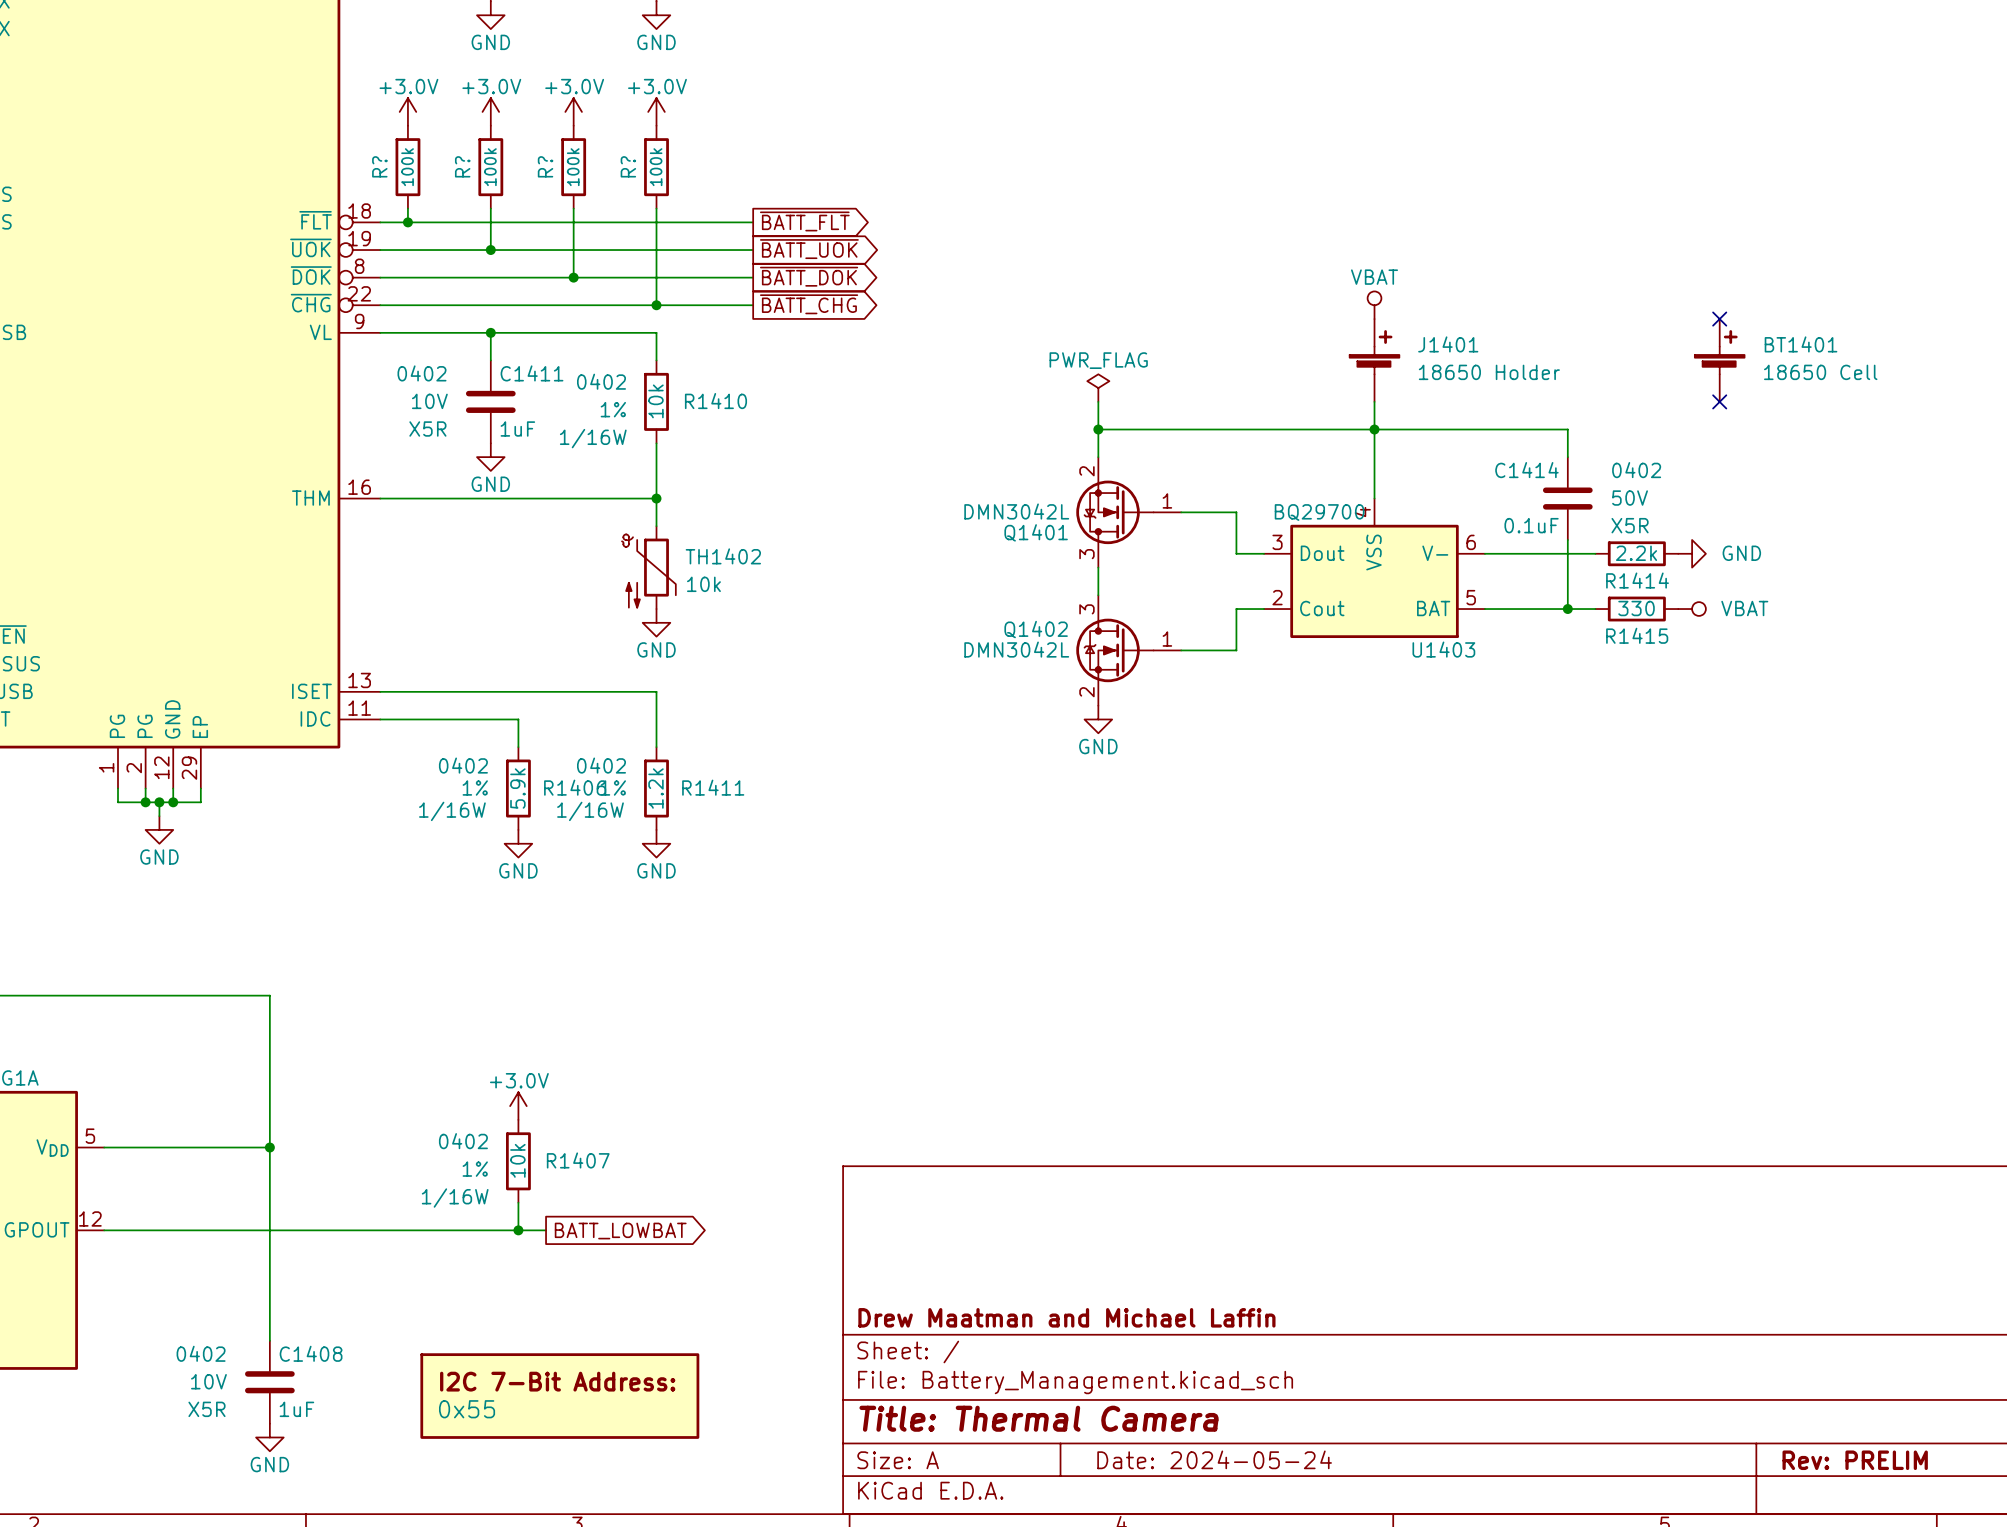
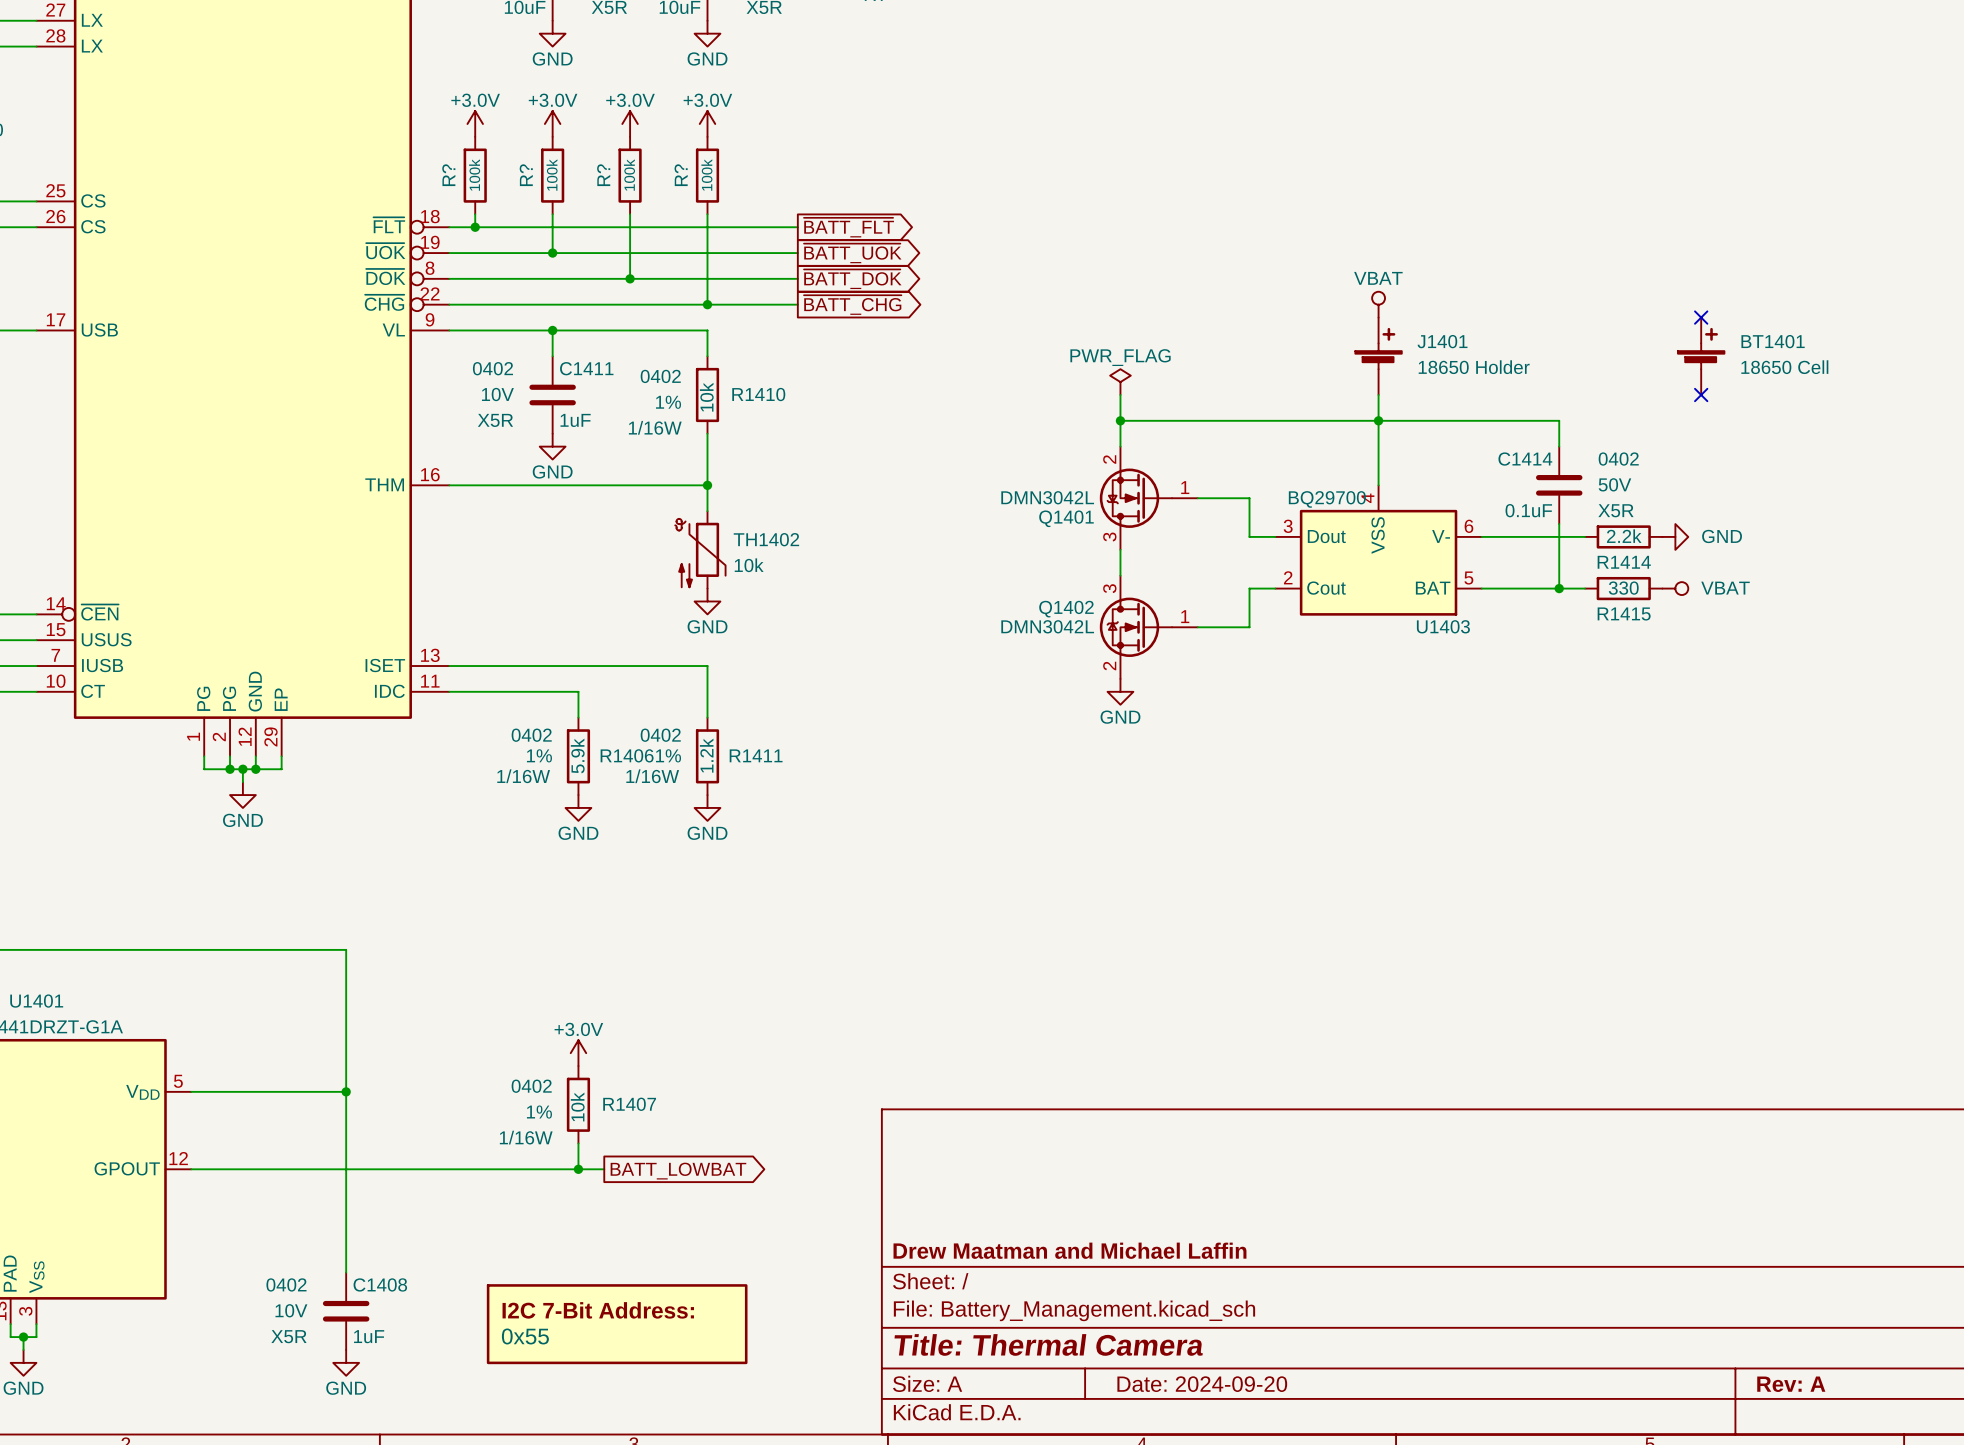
title block: Date: 2024-05-24 (1214, 1459) -> Date: 2024-09-20 (1202, 1384)
title block: Rev: PRELIM (1855, 1460) -> Rev: A (1791, 1384)

